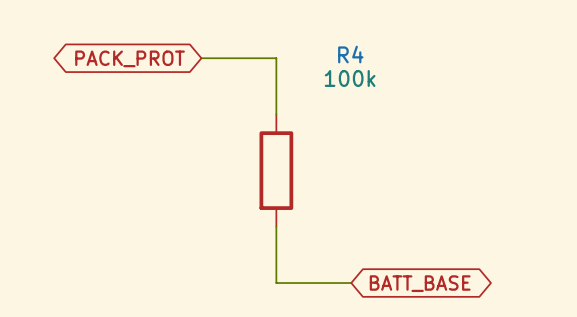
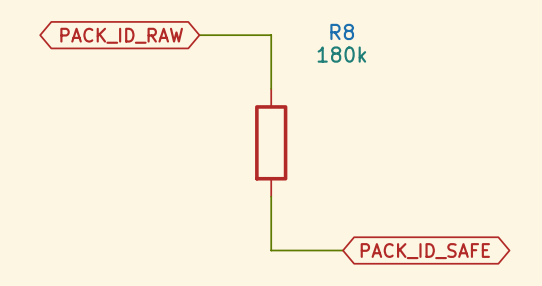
R4 name: R4 (350, 54) -> R8 (342, 31)
global label: PACK_PROT (130, 58) -> PACK_ID_RAW (121, 35)
R4 value: 100k (350, 78) -> 180k (341, 54)
global label: BATT_BASE (420, 283) -> PACK_ID_SAFE (425, 251)

